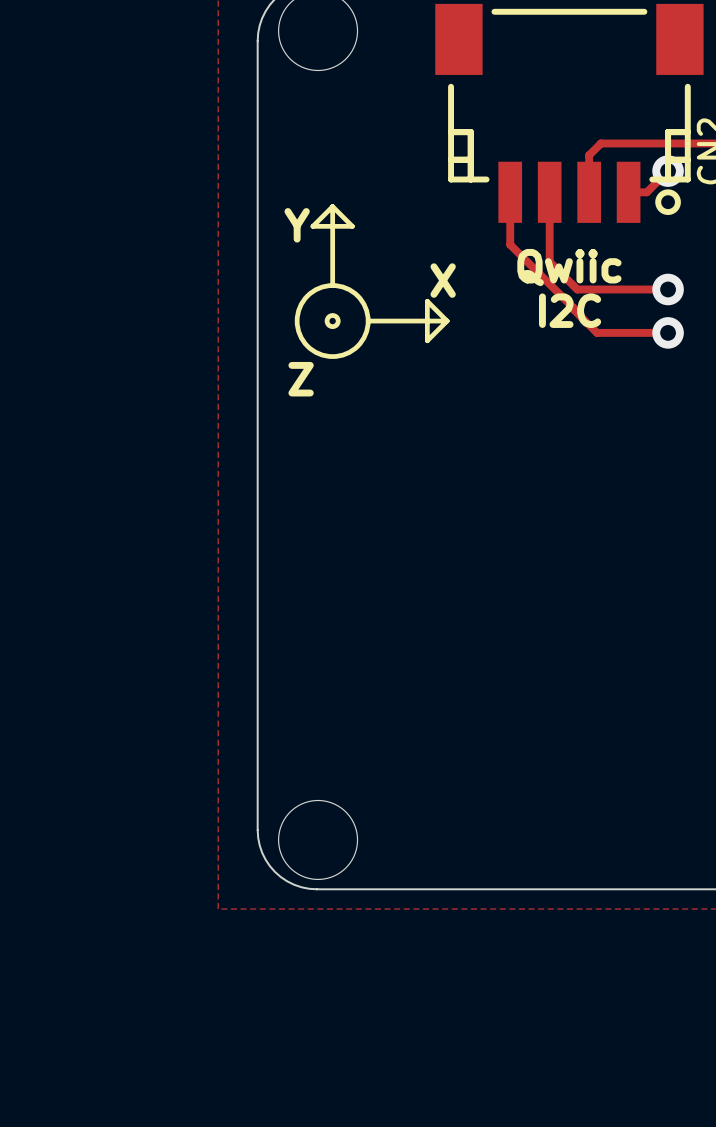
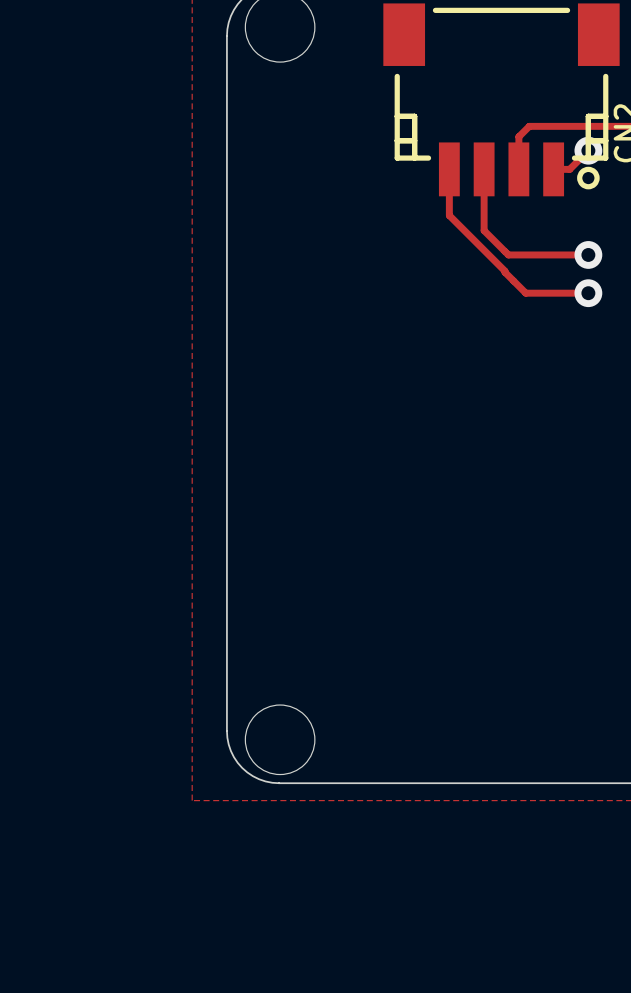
line: (332, 206) (352, 226) (312, 226) (332, 206) -> none
line: (332, 206) (332, 285) -> none
text: Y (297, 225) -> none
text: Qwiic (569, 267) -> none
text: X (443, 280) -> none
drawing: [294, 283, 371, 359] -> none
text: I2C (570, 310) -> none
line: (368, 321) (447, 321) -> none
line: (447, 321) (427, 301) (427, 340) (447, 321) -> none
text: Z (301, 379) -> none

